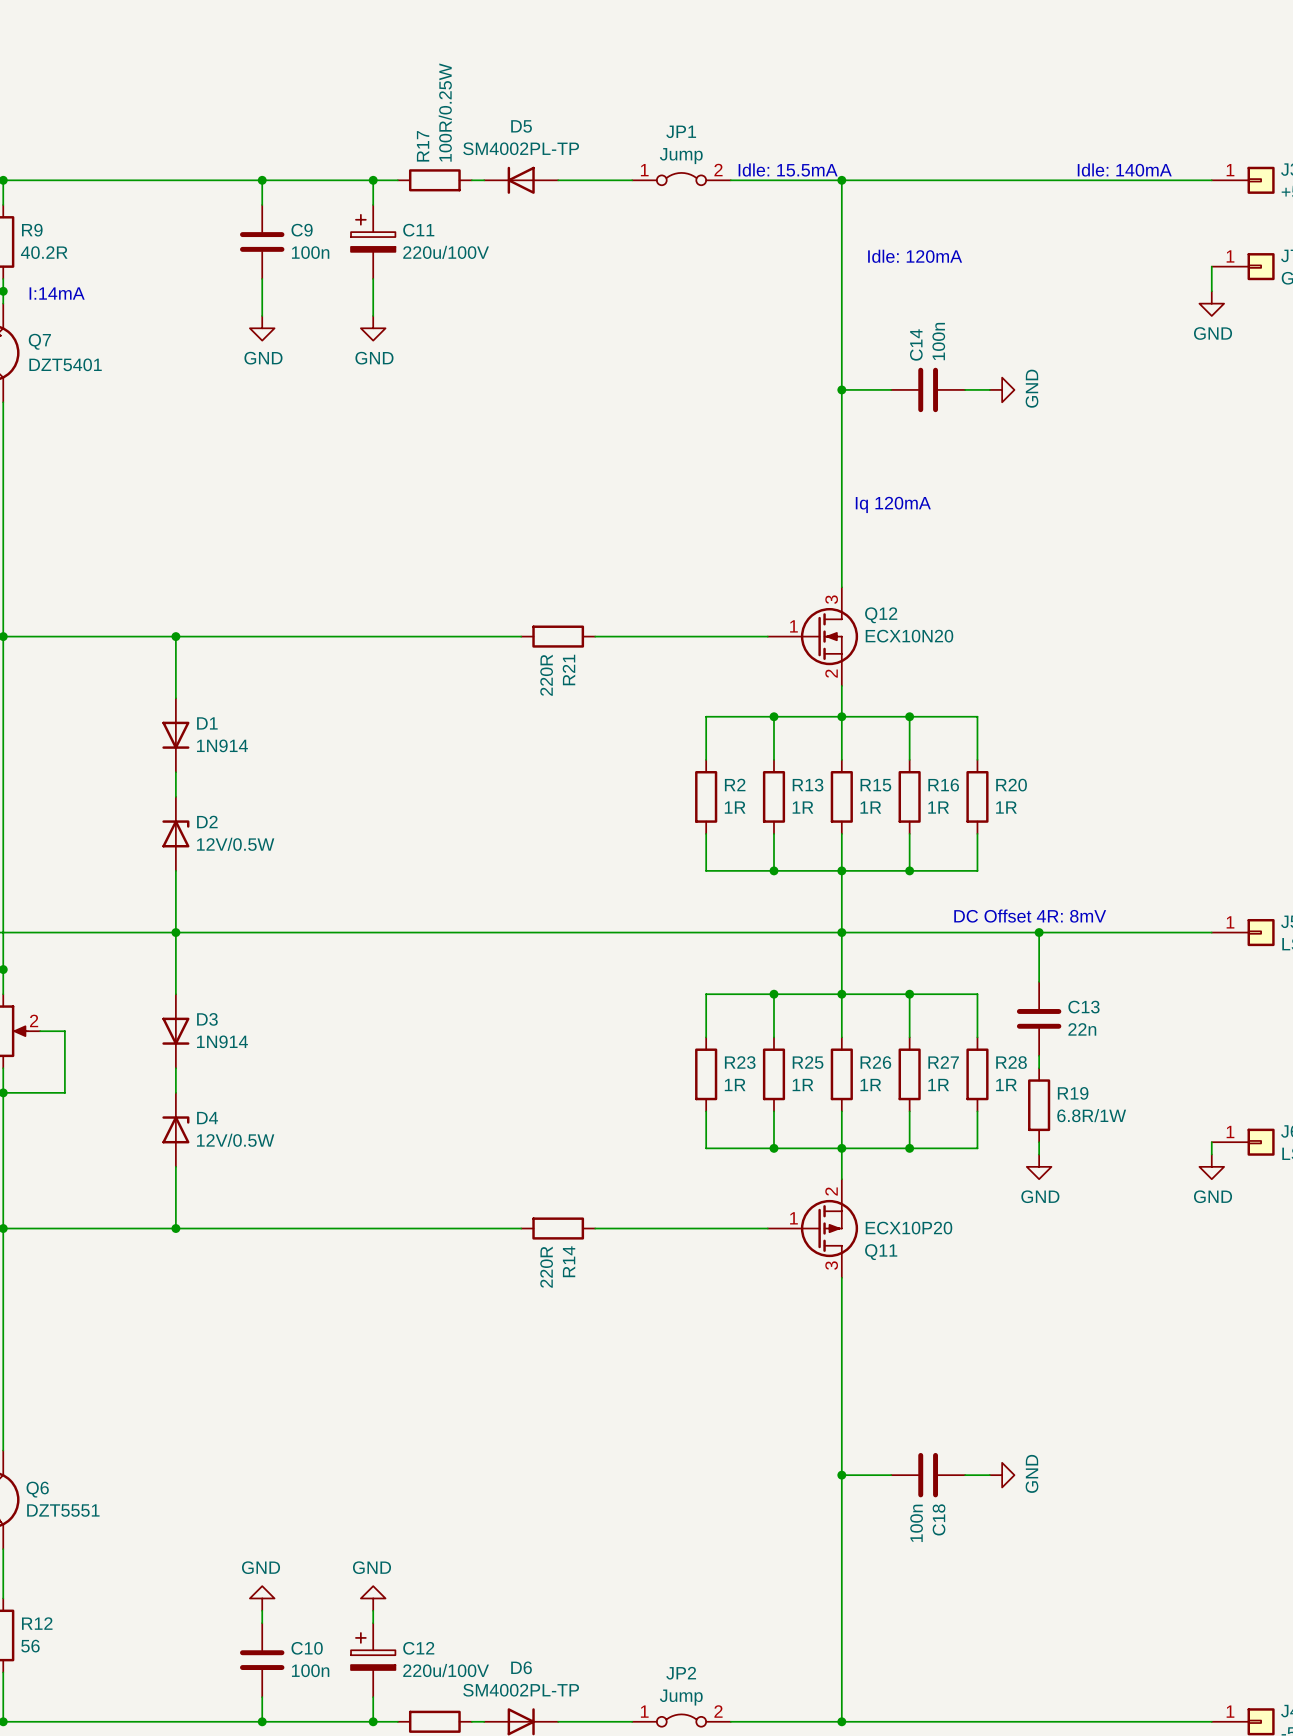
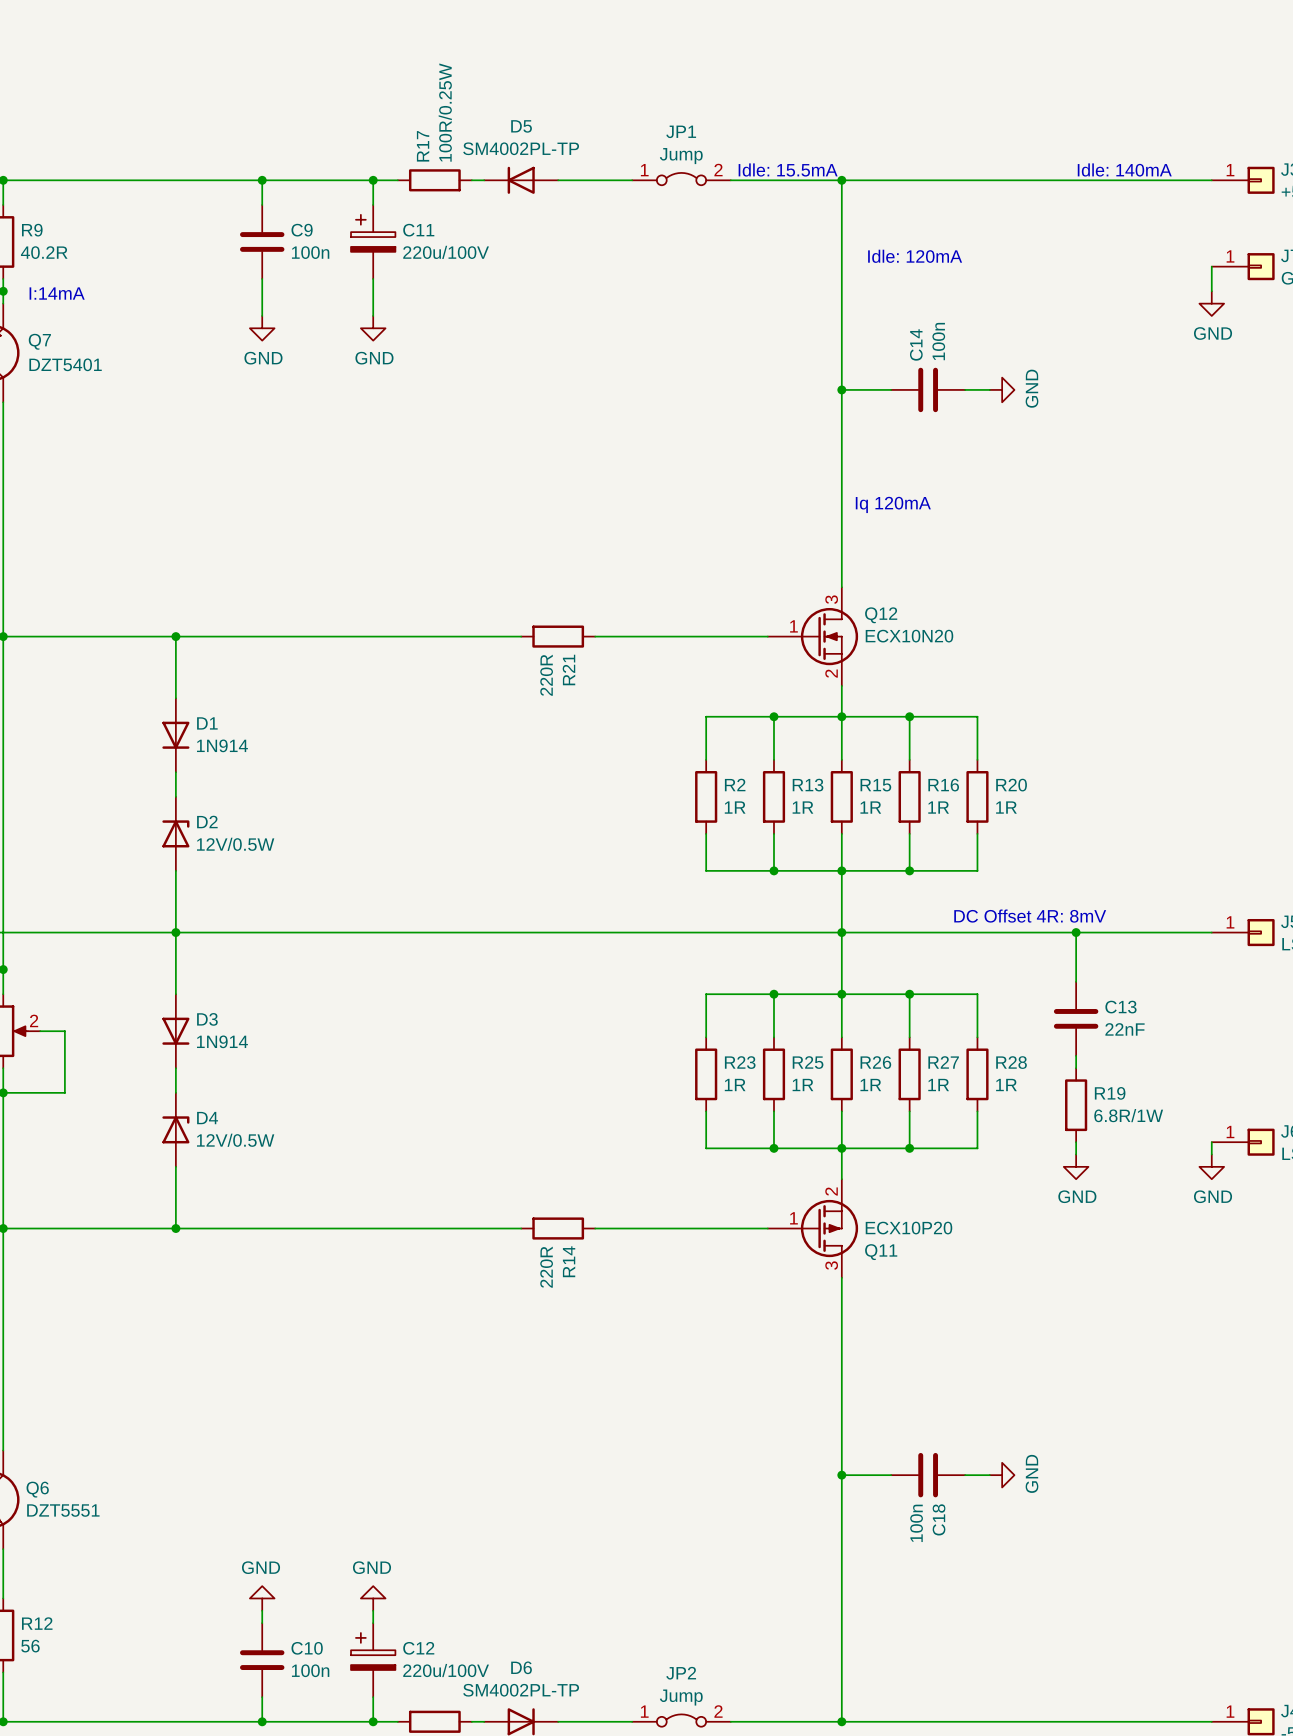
wire: (1039, 932) (1039, 981) -> (1076, 932) (1076, 981)
junction position: (1039, 932) -> (1076, 932)
C13 position: (1039, 1018) -> (1076, 1018)
C13 value: 22n (1082, 1029) -> 22nF (1125, 1029)
wire: (1039, 1055) (1039, 1068) -> (1076, 1055) (1076, 1068)
R19 position: (1039, 1105) -> (1076, 1105)
wire: (1039, 1142) (1039, 1154) -> (1076, 1142) (1076, 1154)
power symbol position: GND (1039, 1166) -> GND (1076, 1166)

